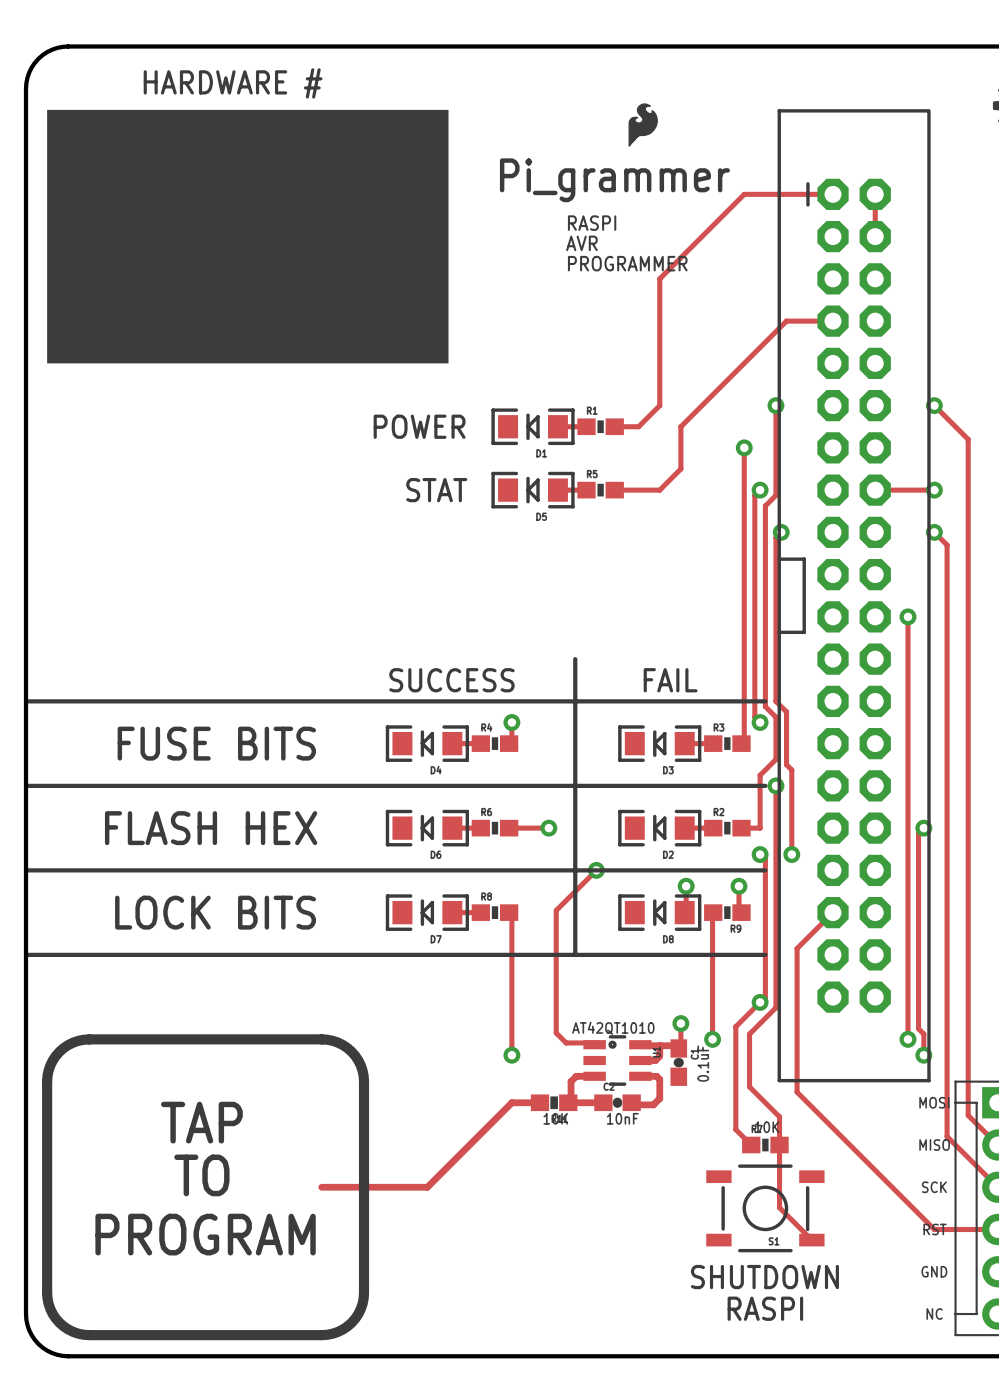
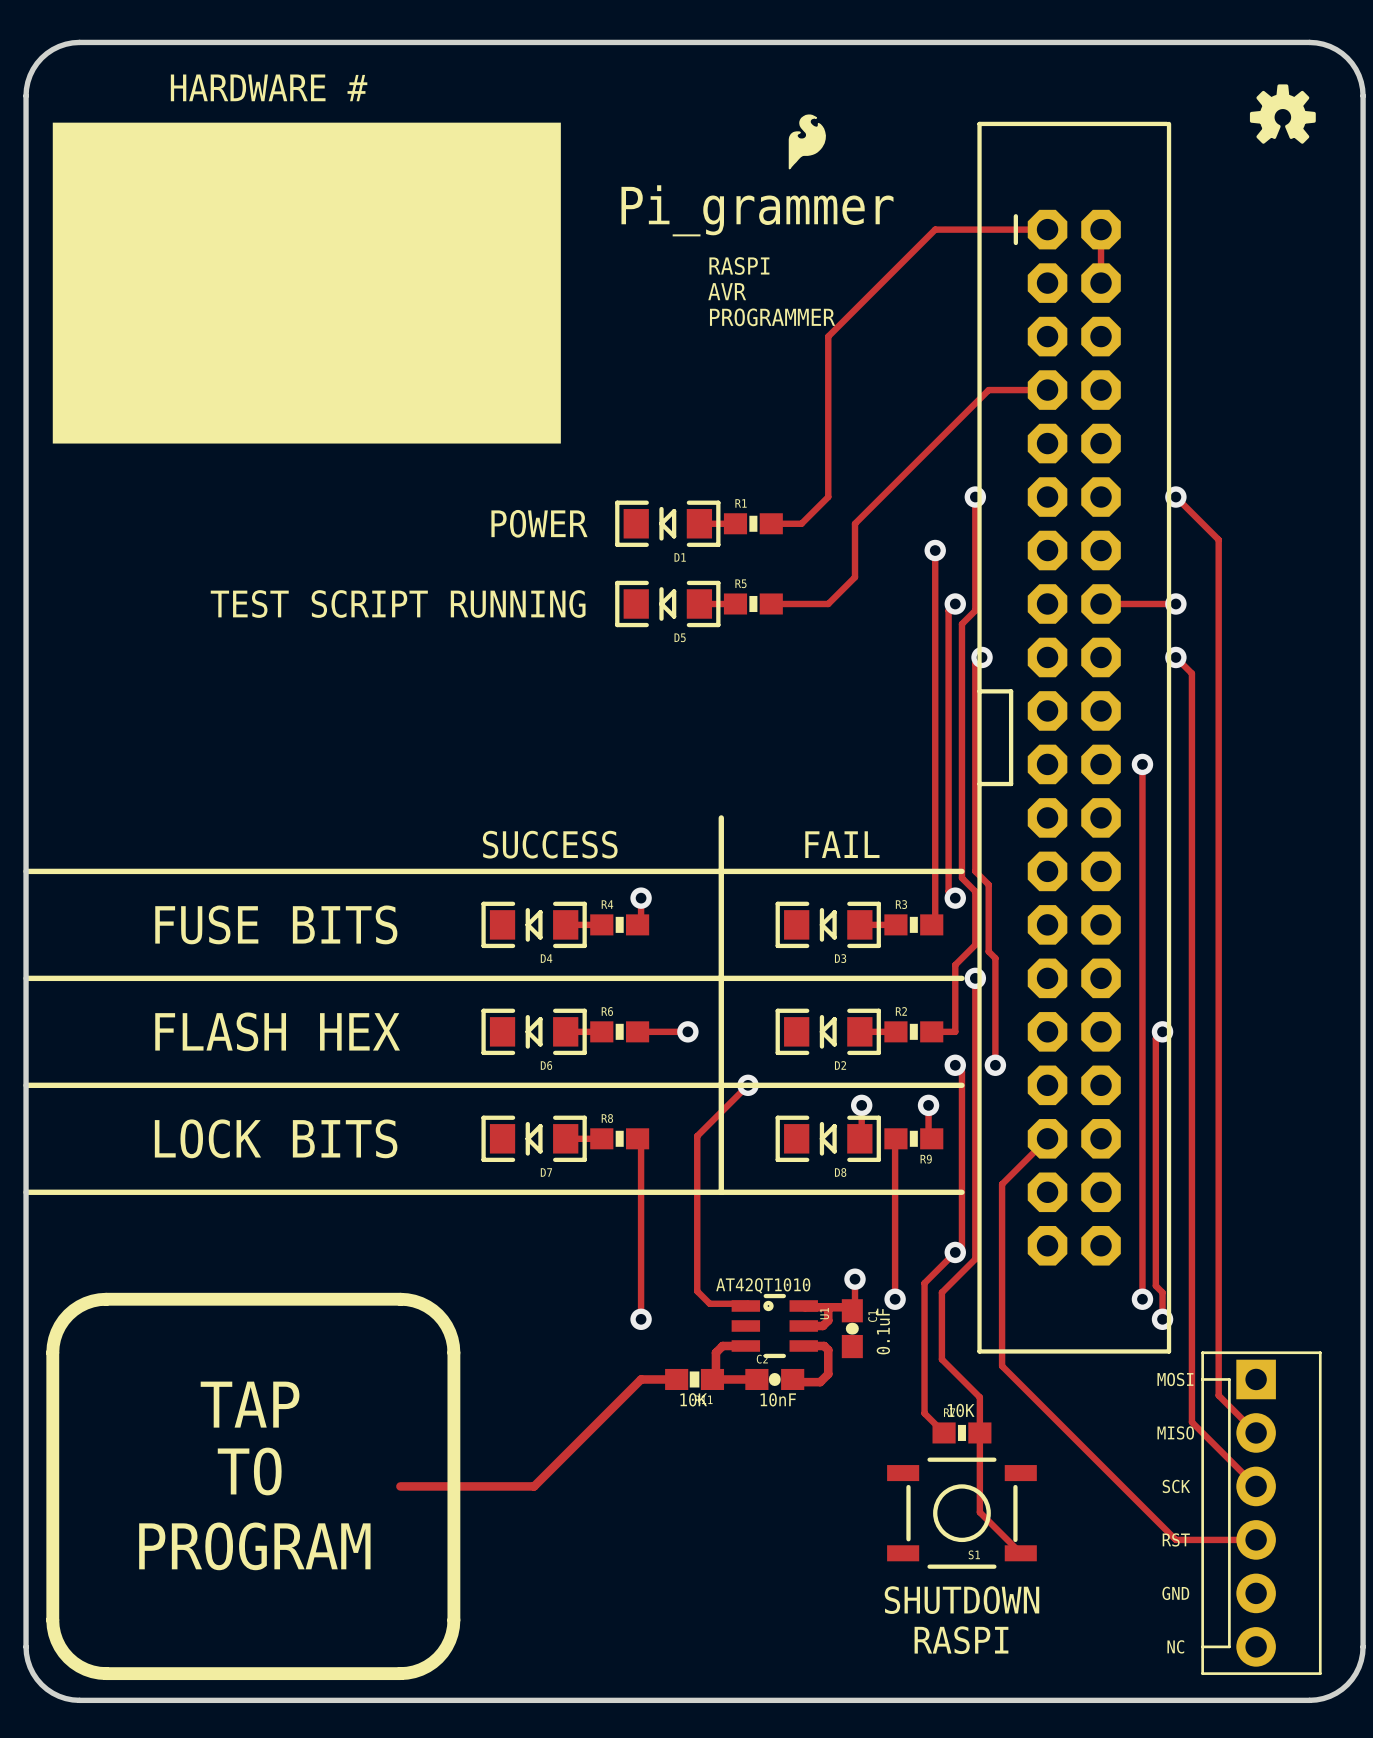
text: STAT (436, 490) -> TEST SCRIPT RUNNING (398, 604)

